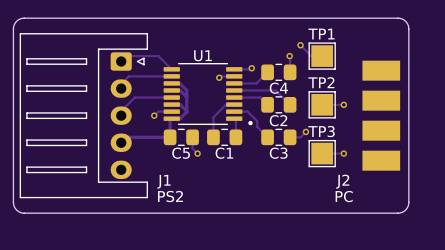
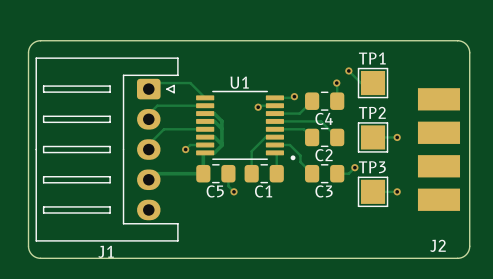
J1 name position: J1 (164, 181) -> J1 (106, 251)
J2 name position: J2 (342, 181) -> J2 (438, 245)
J1 value: PS2 (170, 196) -> none
J2 value: PC (344, 196) -> none

